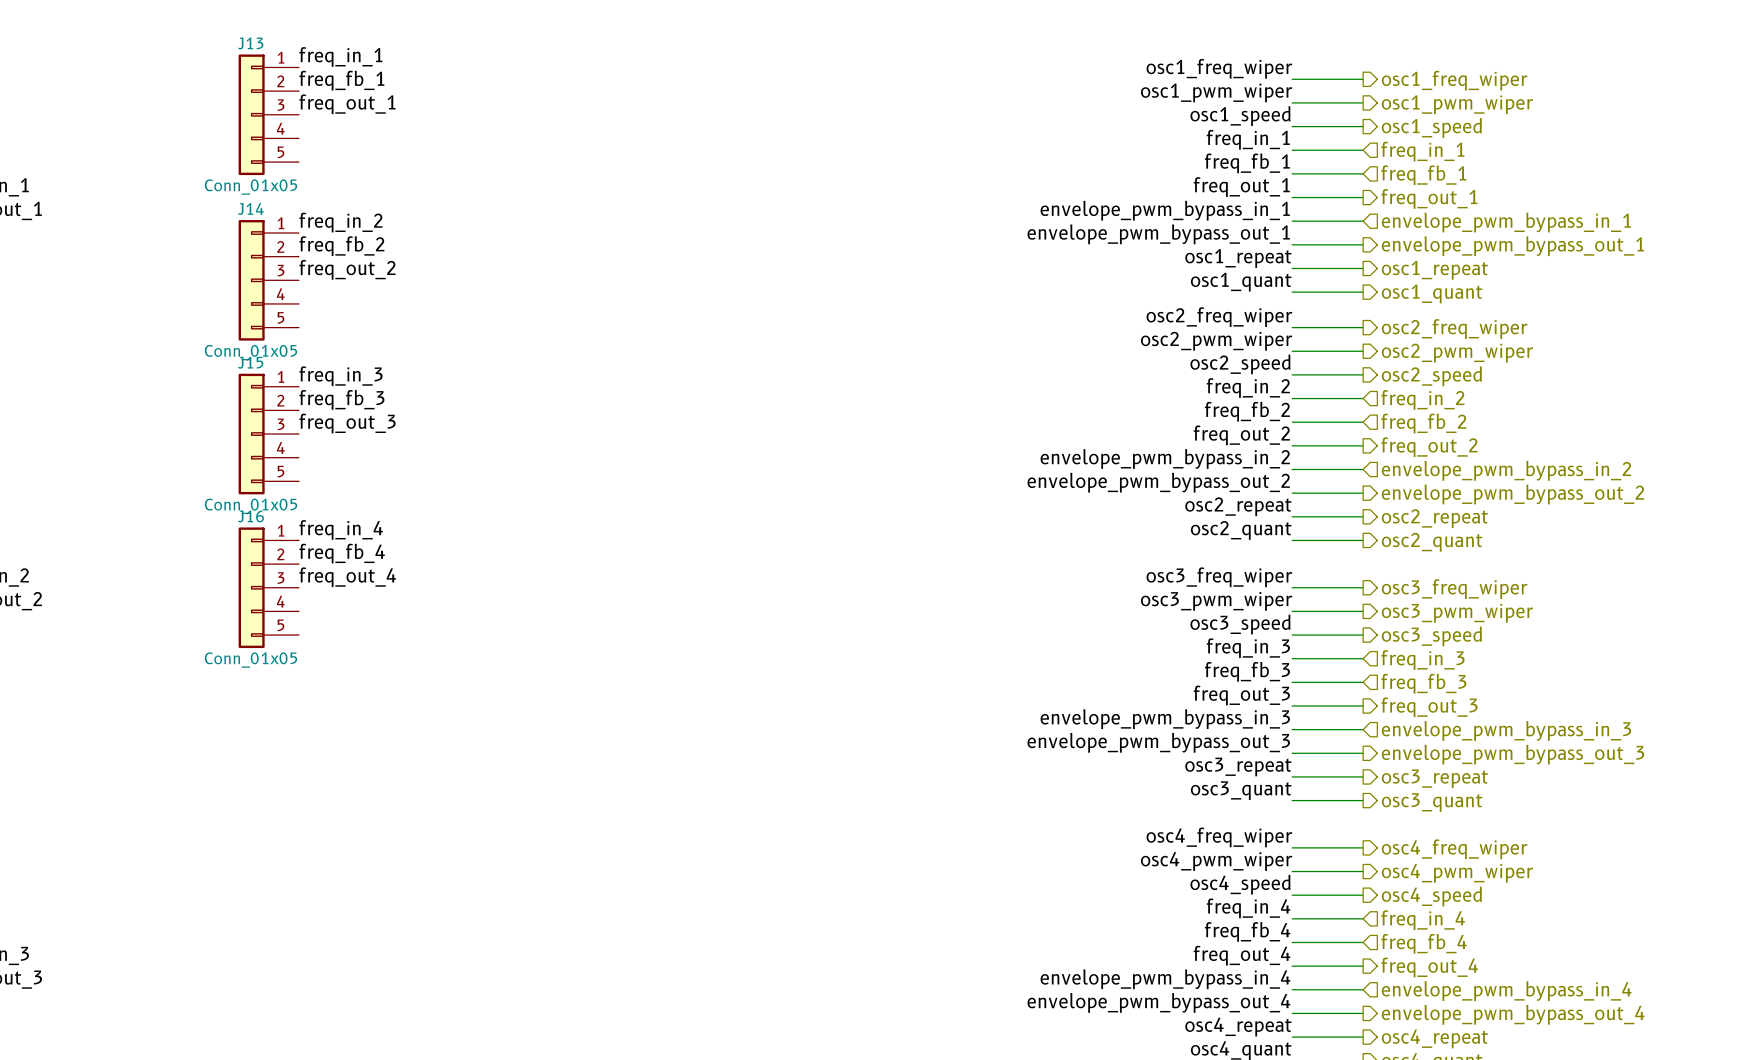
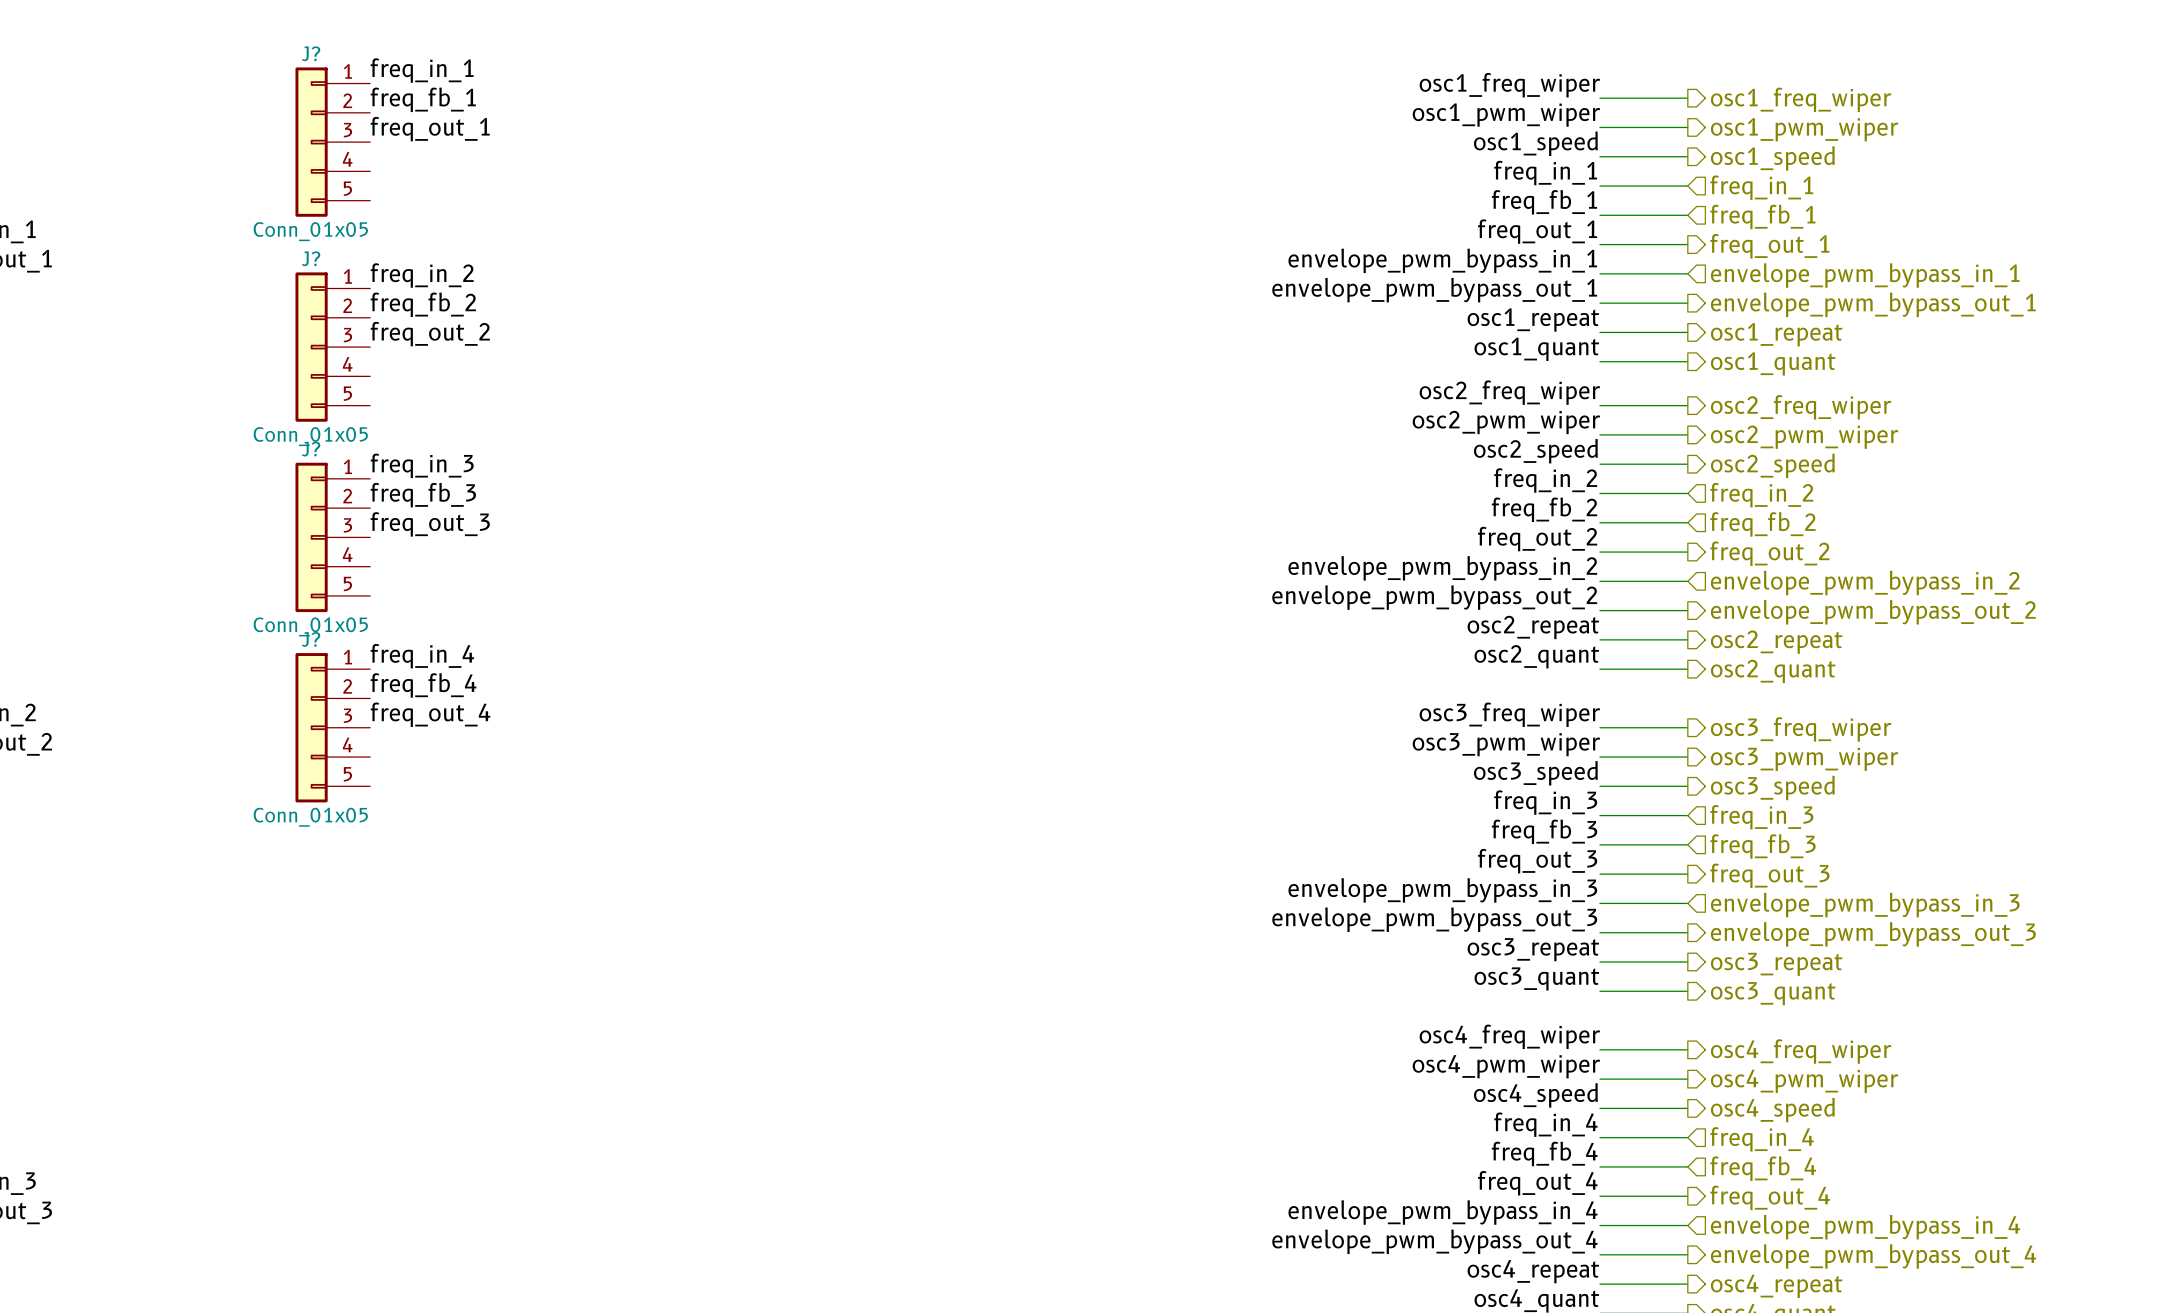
J13 name: J13 (250, 43) -> J? (311, 53)
J14 name: J14 (250, 208) -> J? (311, 258)
J15 name: J15 (250, 362) -> J? (311, 449)
J16 name: J16 (250, 516) -> J? (311, 639)

